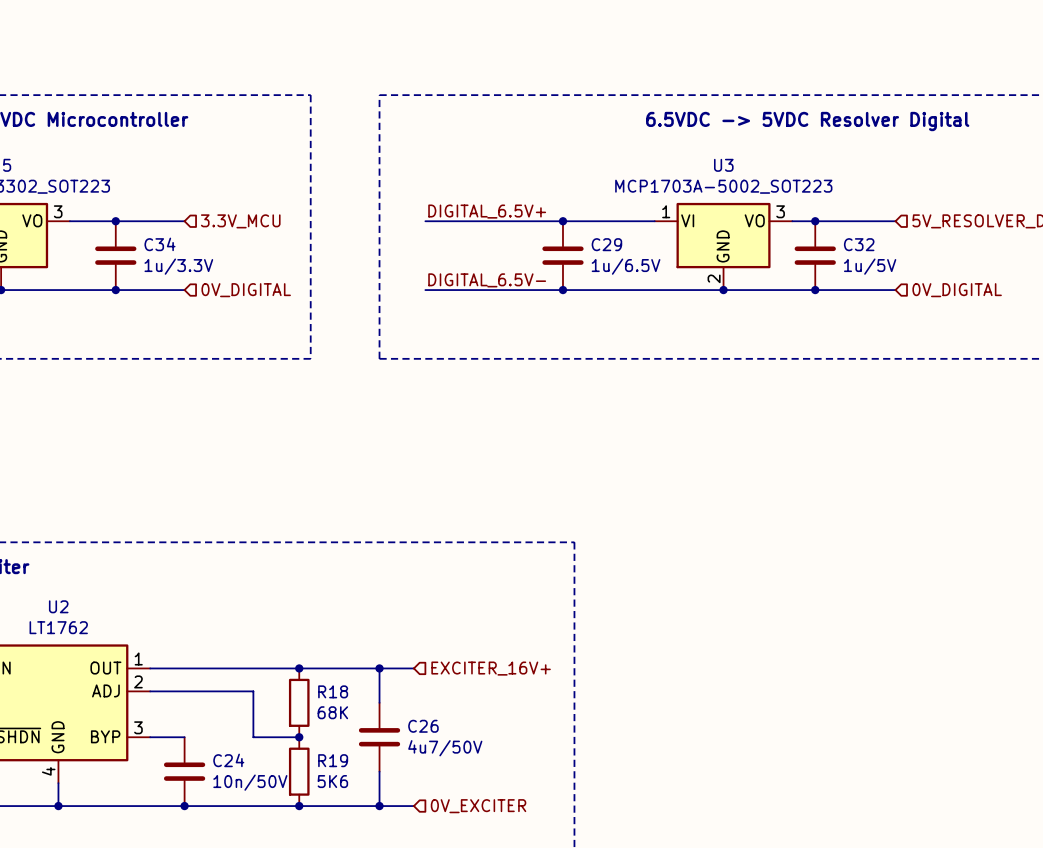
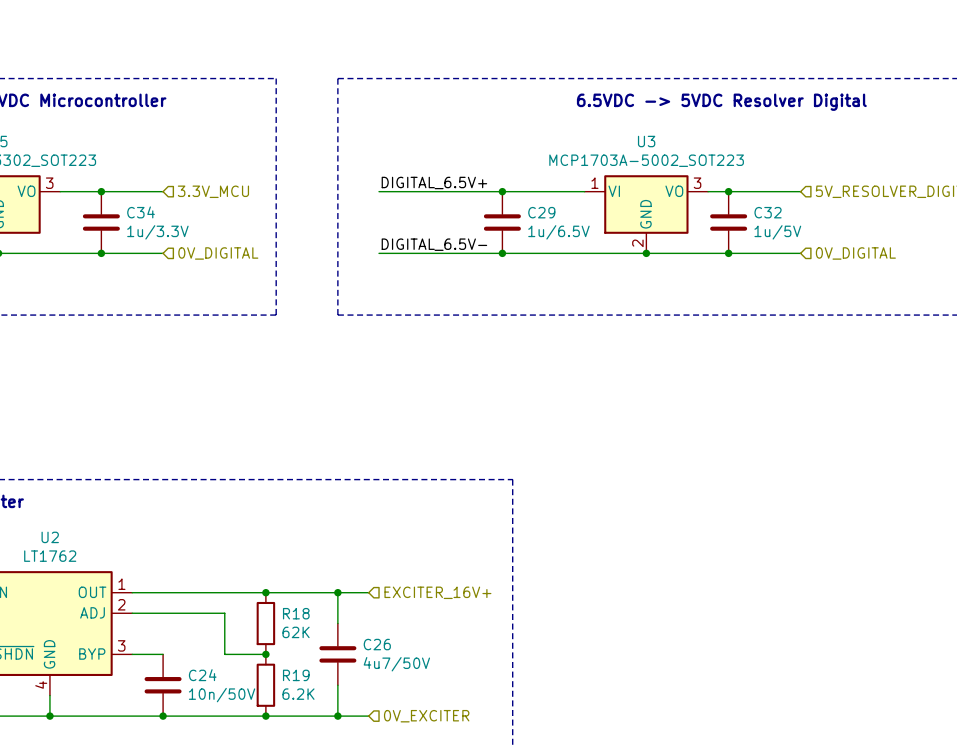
R18 value: 68K (332, 712) -> 62K (296, 632)
R19 value: 5K6 (332, 781) -> 6.2K (298, 694)

